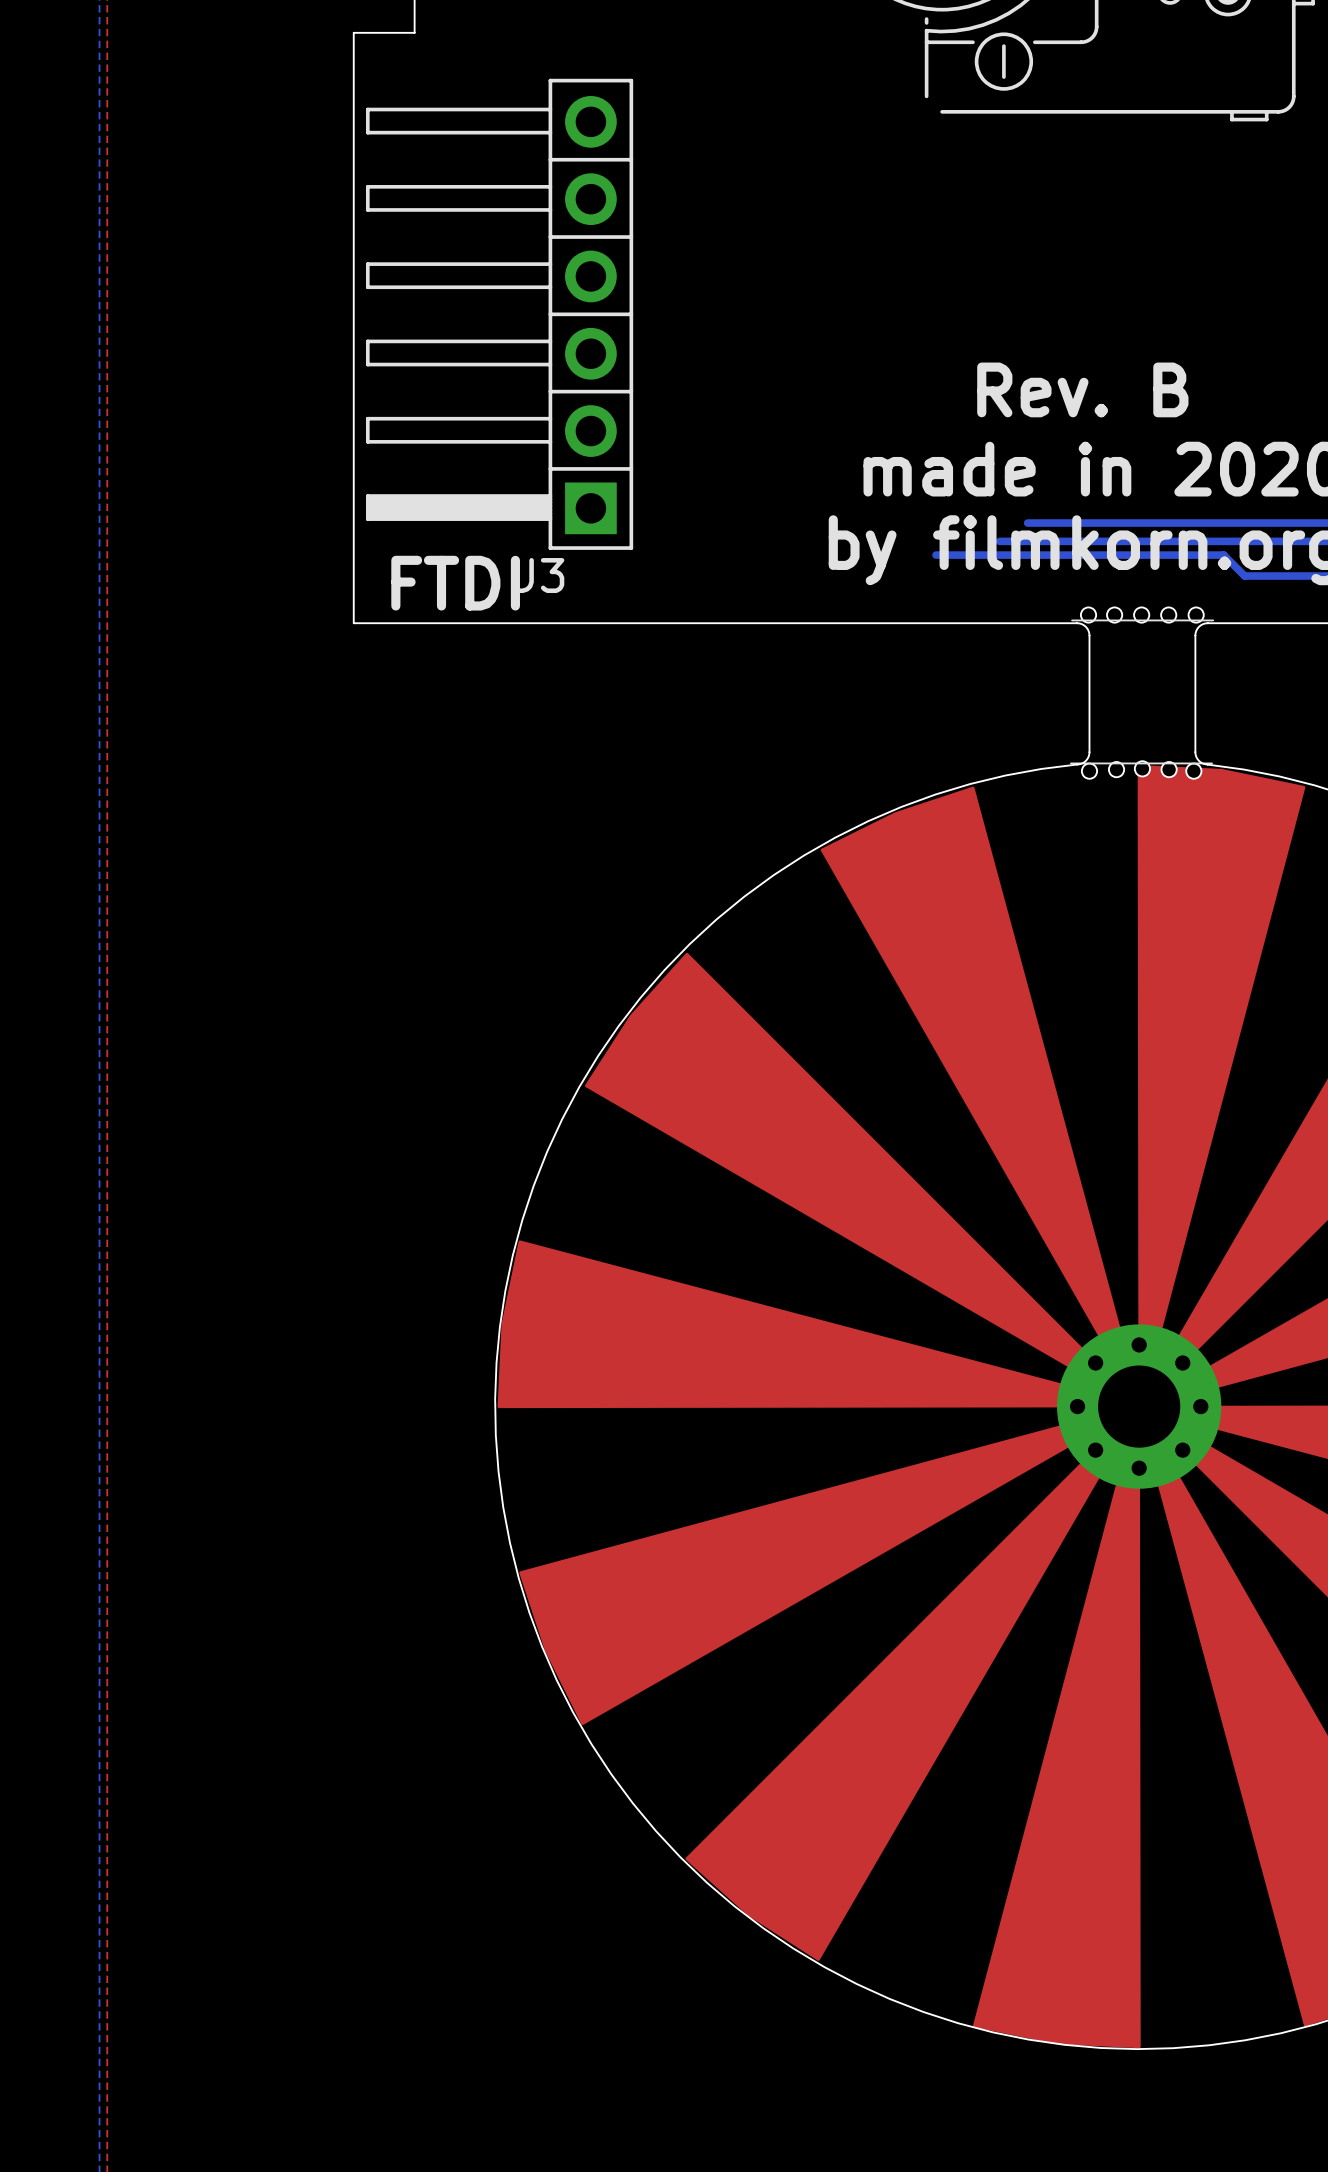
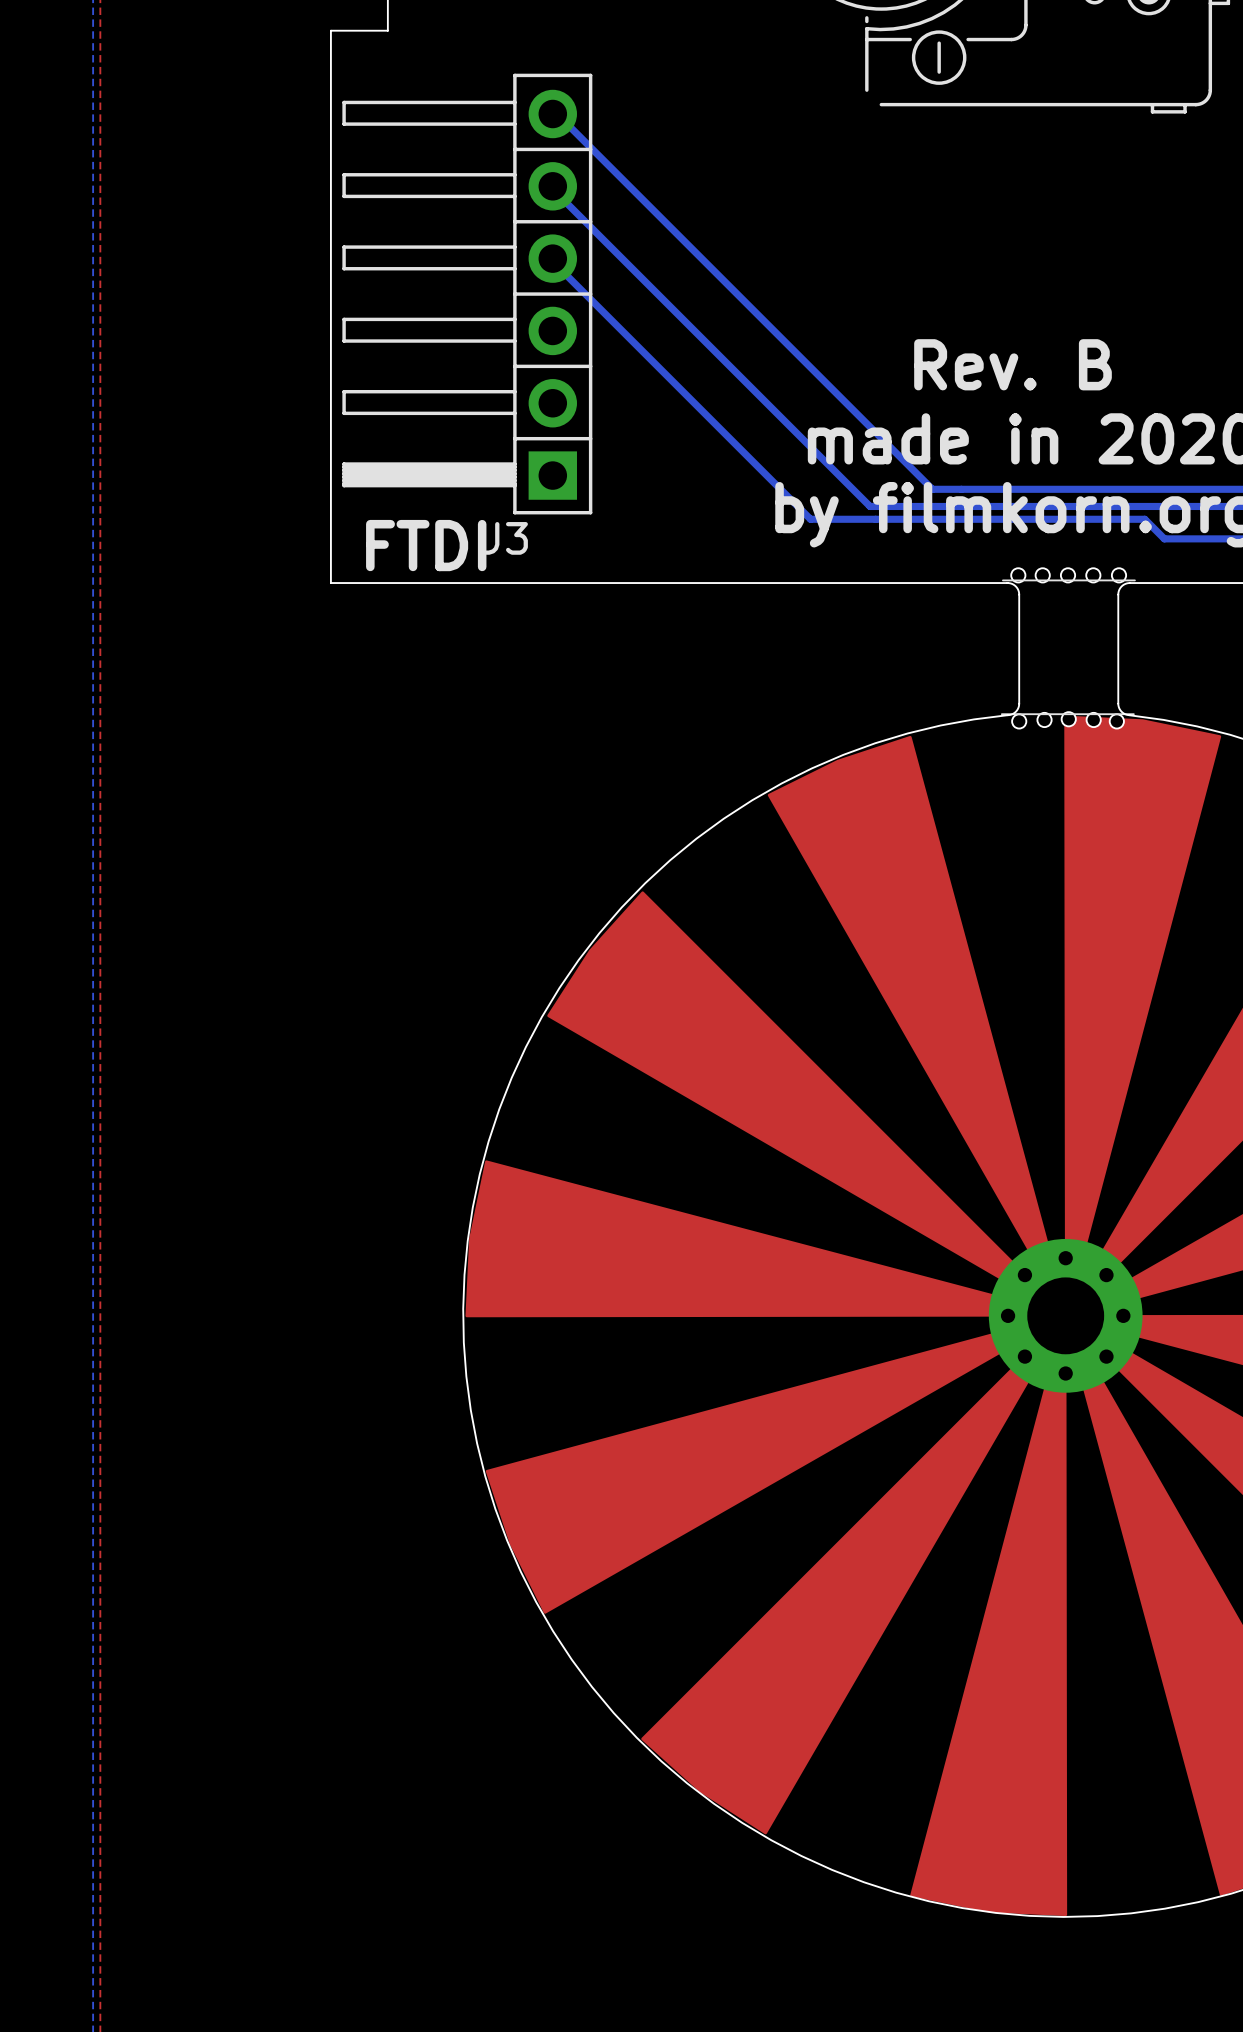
bottom track: none -> (556, 113) (932, 489) (961, 489)
bottom track: none -> (549, 185) (870, 506) (935, 506)
bottom track: none -> (549, 257) (810, 519) (875, 519)

